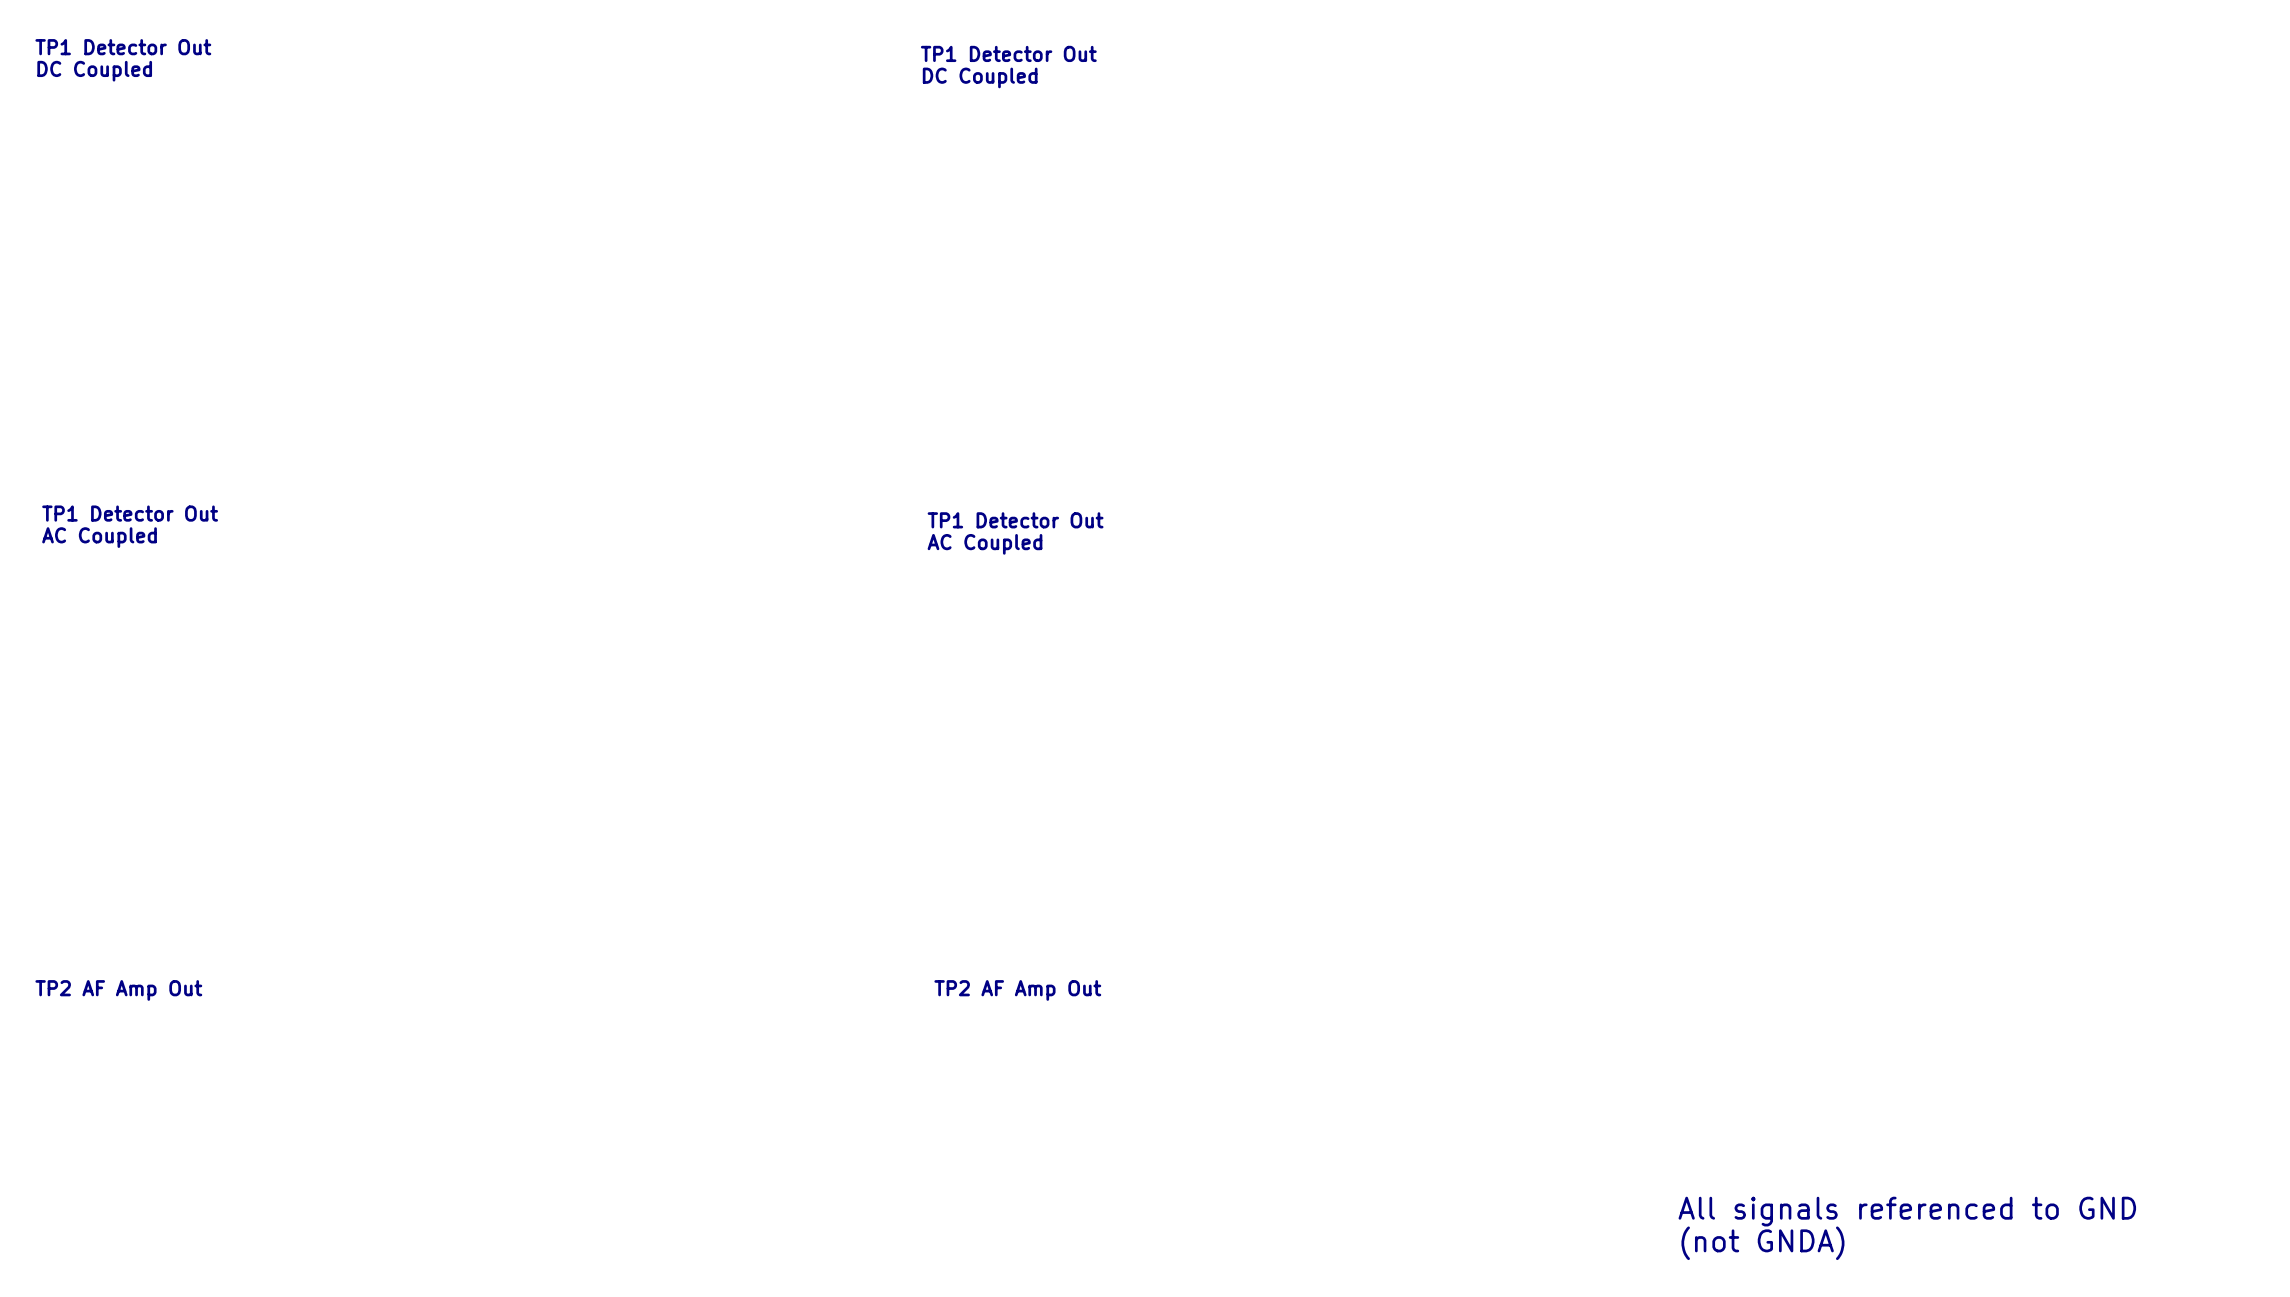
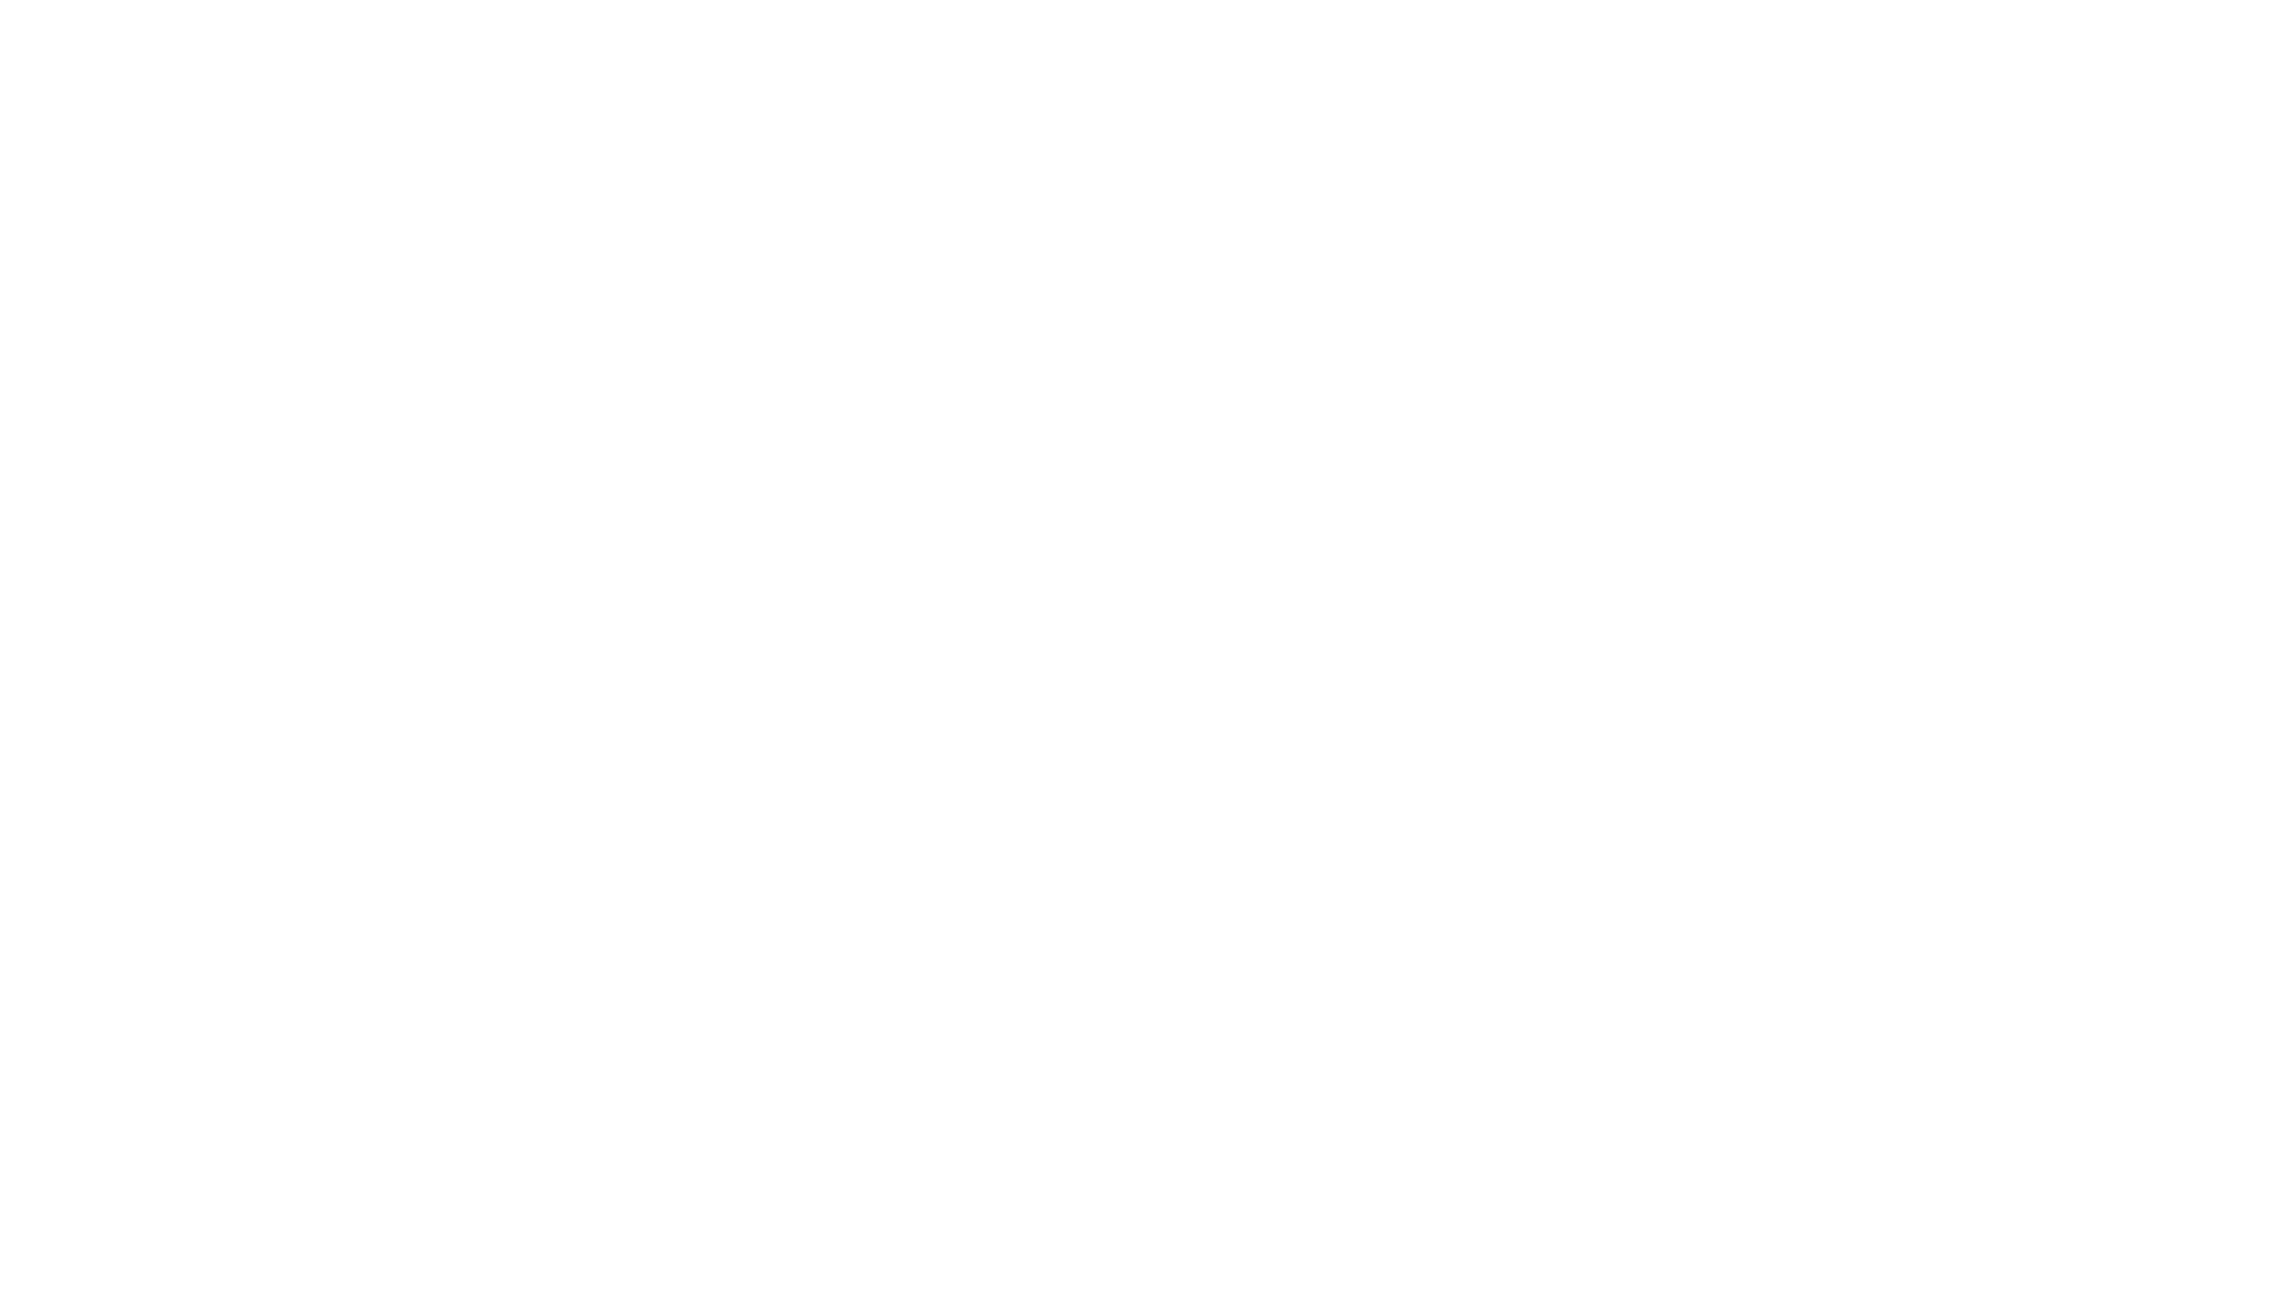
text: TP1 Detector Out (123, 47) -> none
text: TP1 Detector Out (1008, 53) -> none
text: DC Coupled (94, 71) -> none
text: DC Coupled (980, 77) -> none
text: TP1 Detector Out (130, 513) -> none
text: TP1 Detector Out (1015, 520) -> none
text: AC Coupled (99, 537) -> none
text: AC Coupled (984, 544) -> none
text: TP2 AF Amp Out (118, 990) -> none
text: TP2 AF Amp Out (1017, 990) -> none
text: All signals referenced to GND (1907, 1211) -> none
text: (not GNDA) (1762, 1243) -> none

